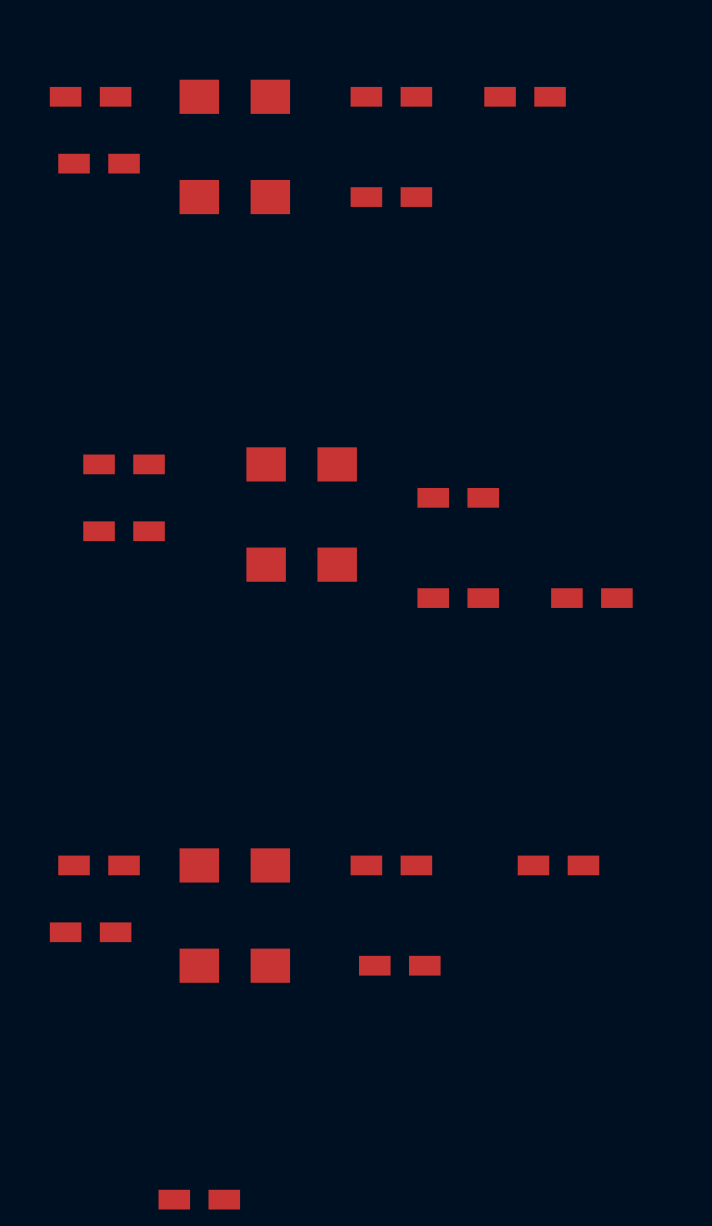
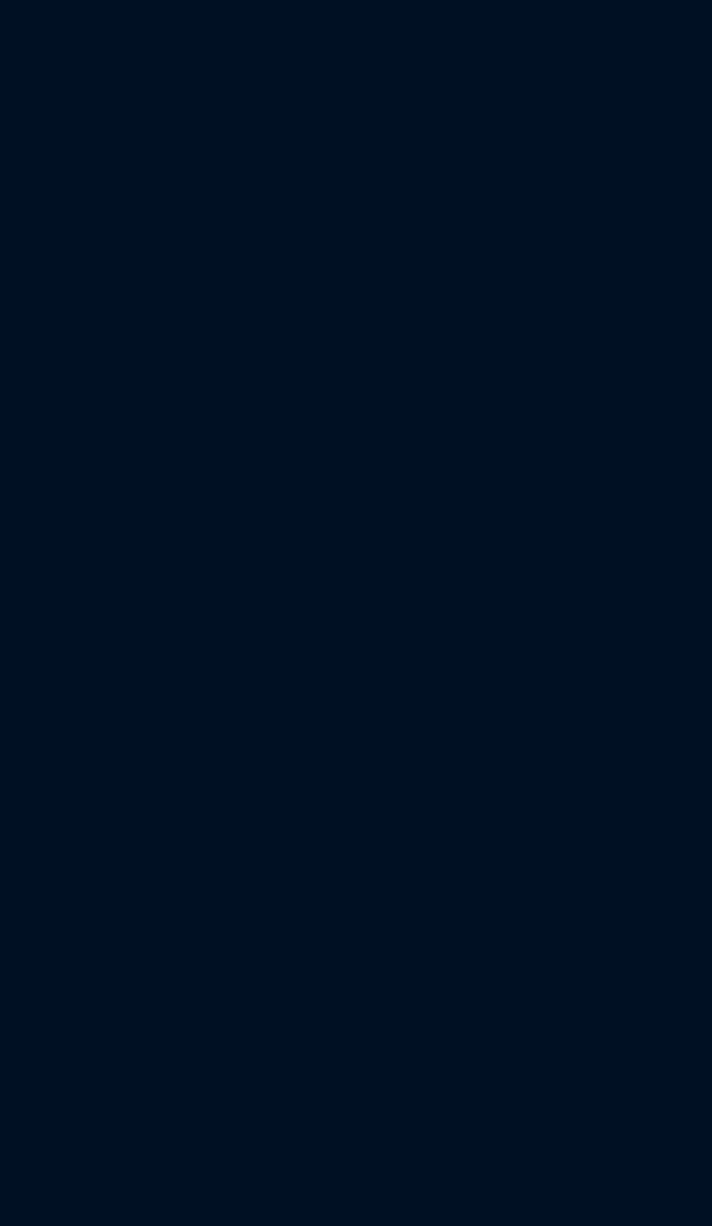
part: (90, 96) -> none
part: (234, 96) -> none
part: (391, 96) -> none
part: (525, 96) -> none
part: (99, 163) -> none
part: (234, 197) -> none
part: (391, 197) -> none
part: (124, 464) -> none
part: (301, 464) -> none
part: (458, 497) -> none
part: (124, 531) -> none
part: (301, 564) -> none
part: (458, 598) -> none
part: (591, 598) -> none
part: (99, 865) -> none
part: (234, 865) -> none
part: (391, 865) -> none
part: (558, 865) -> none
part: (90, 932) -> none
part: (234, 965) -> none
part: (399, 965) -> none
part: (199, 1199) -> none

